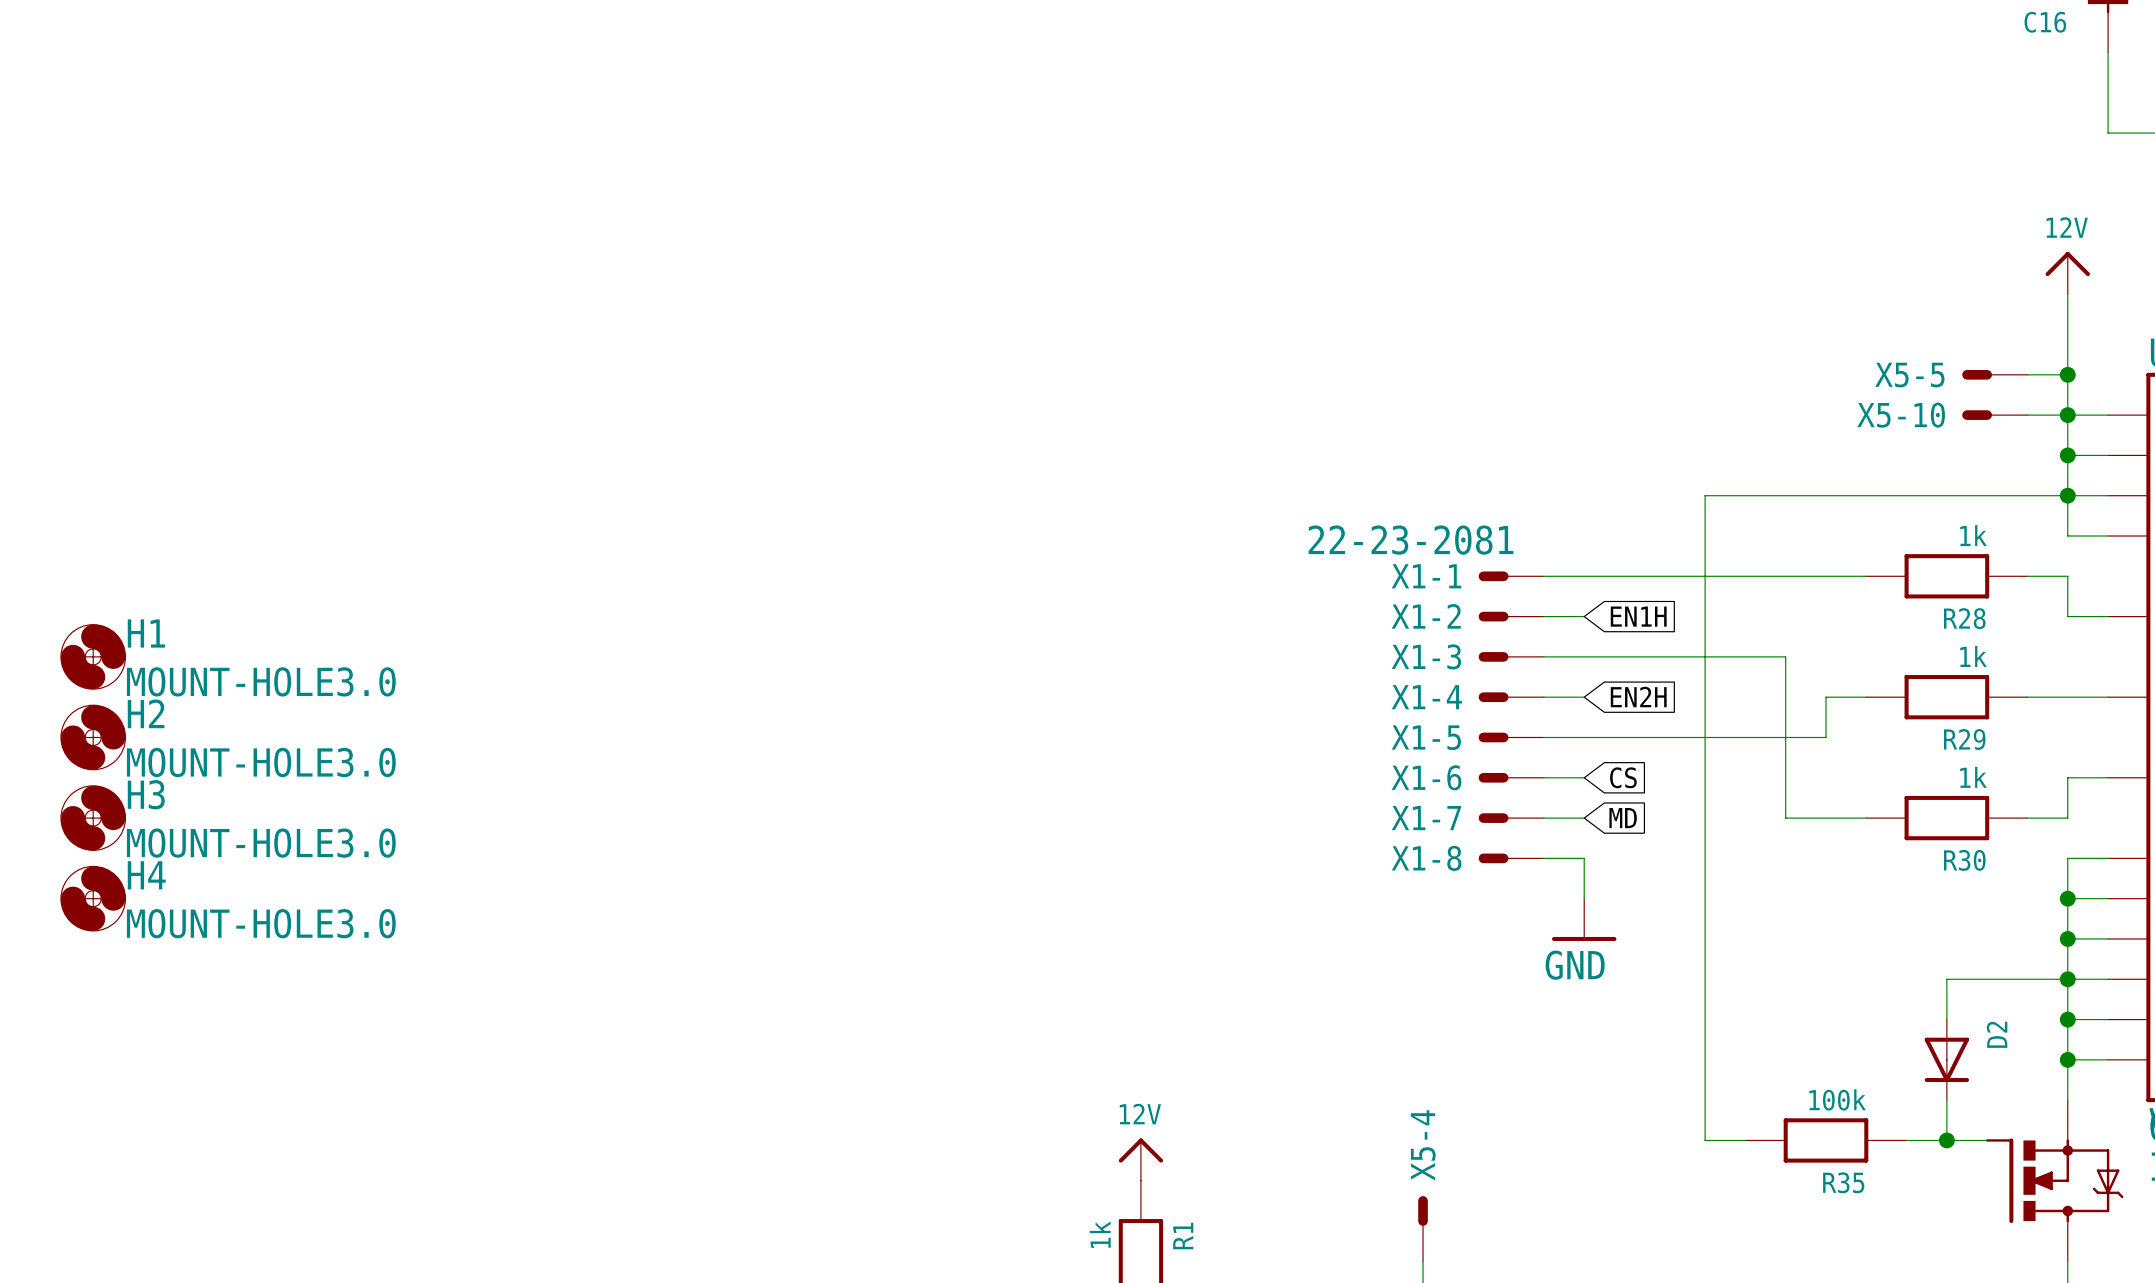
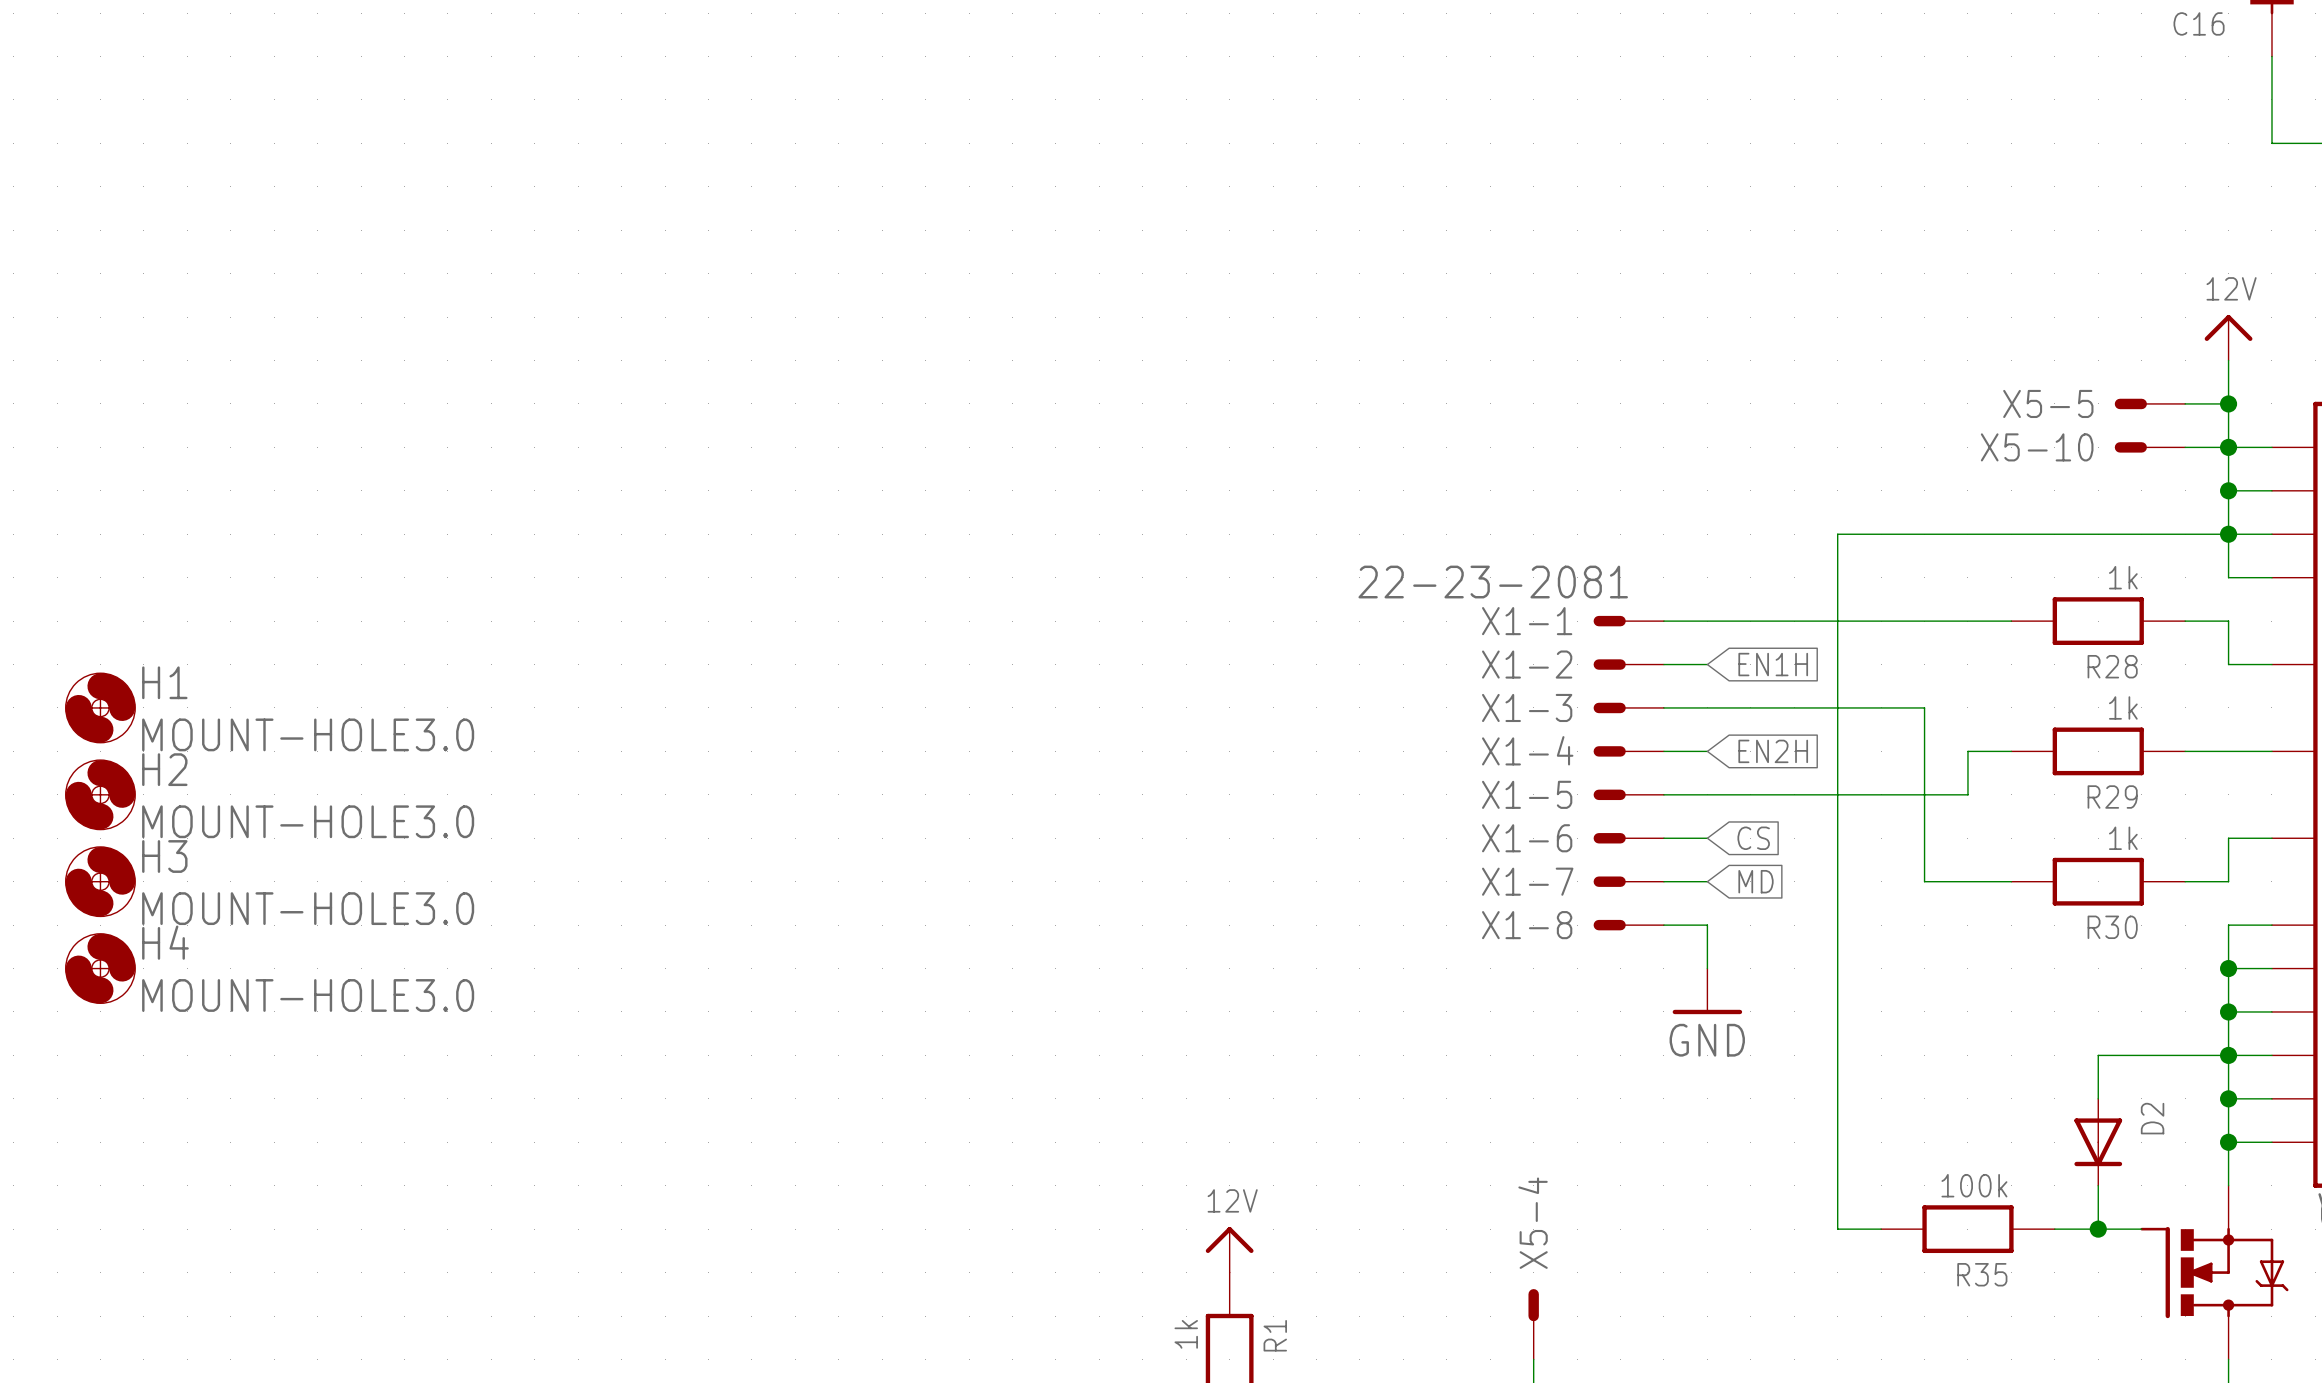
power symbol position: 12V (2067, 273) -> 12V (2228, 337)

